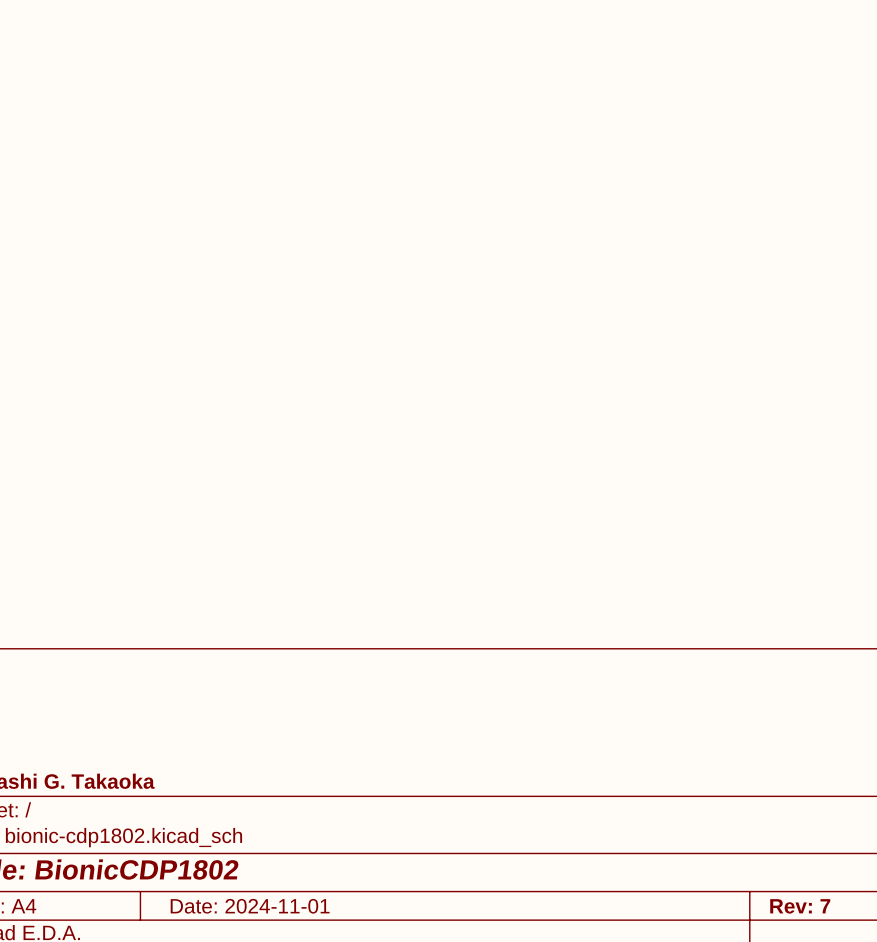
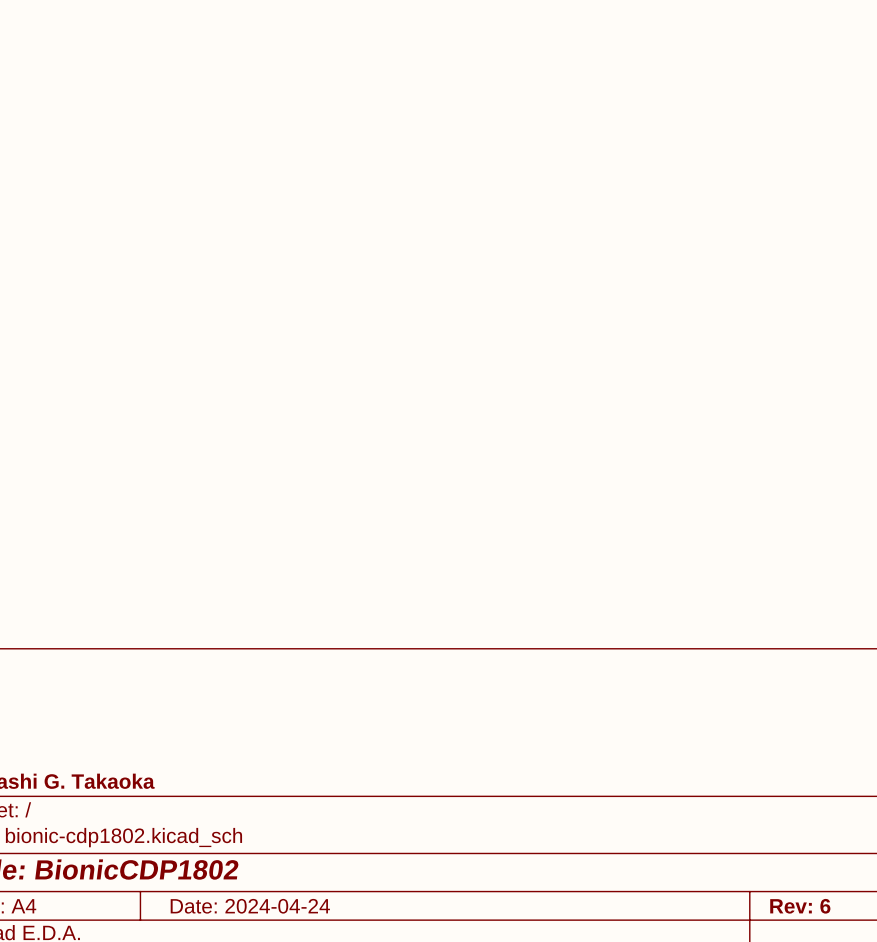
title block: Date: 2024-11-01 (250, 906) -> Date: 2024-04-24 (250, 906)
title block: Rev: 7 (800, 906) -> Rev: 6 (800, 906)

